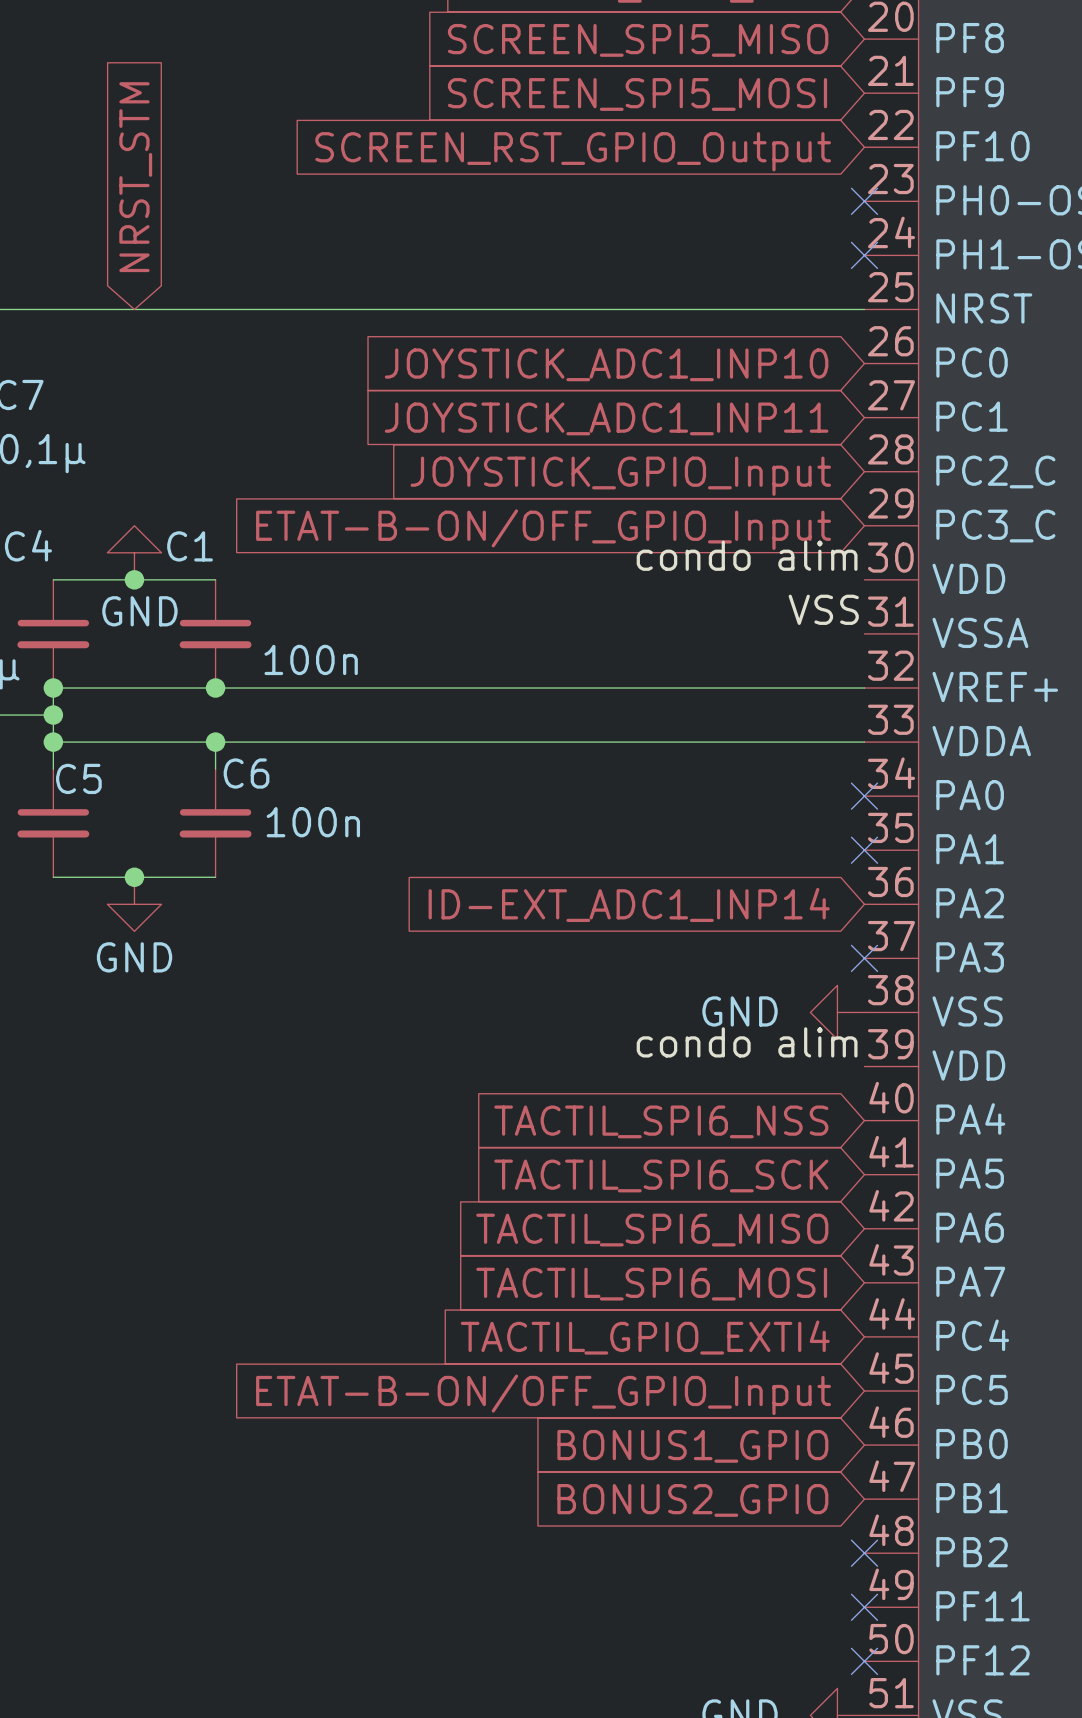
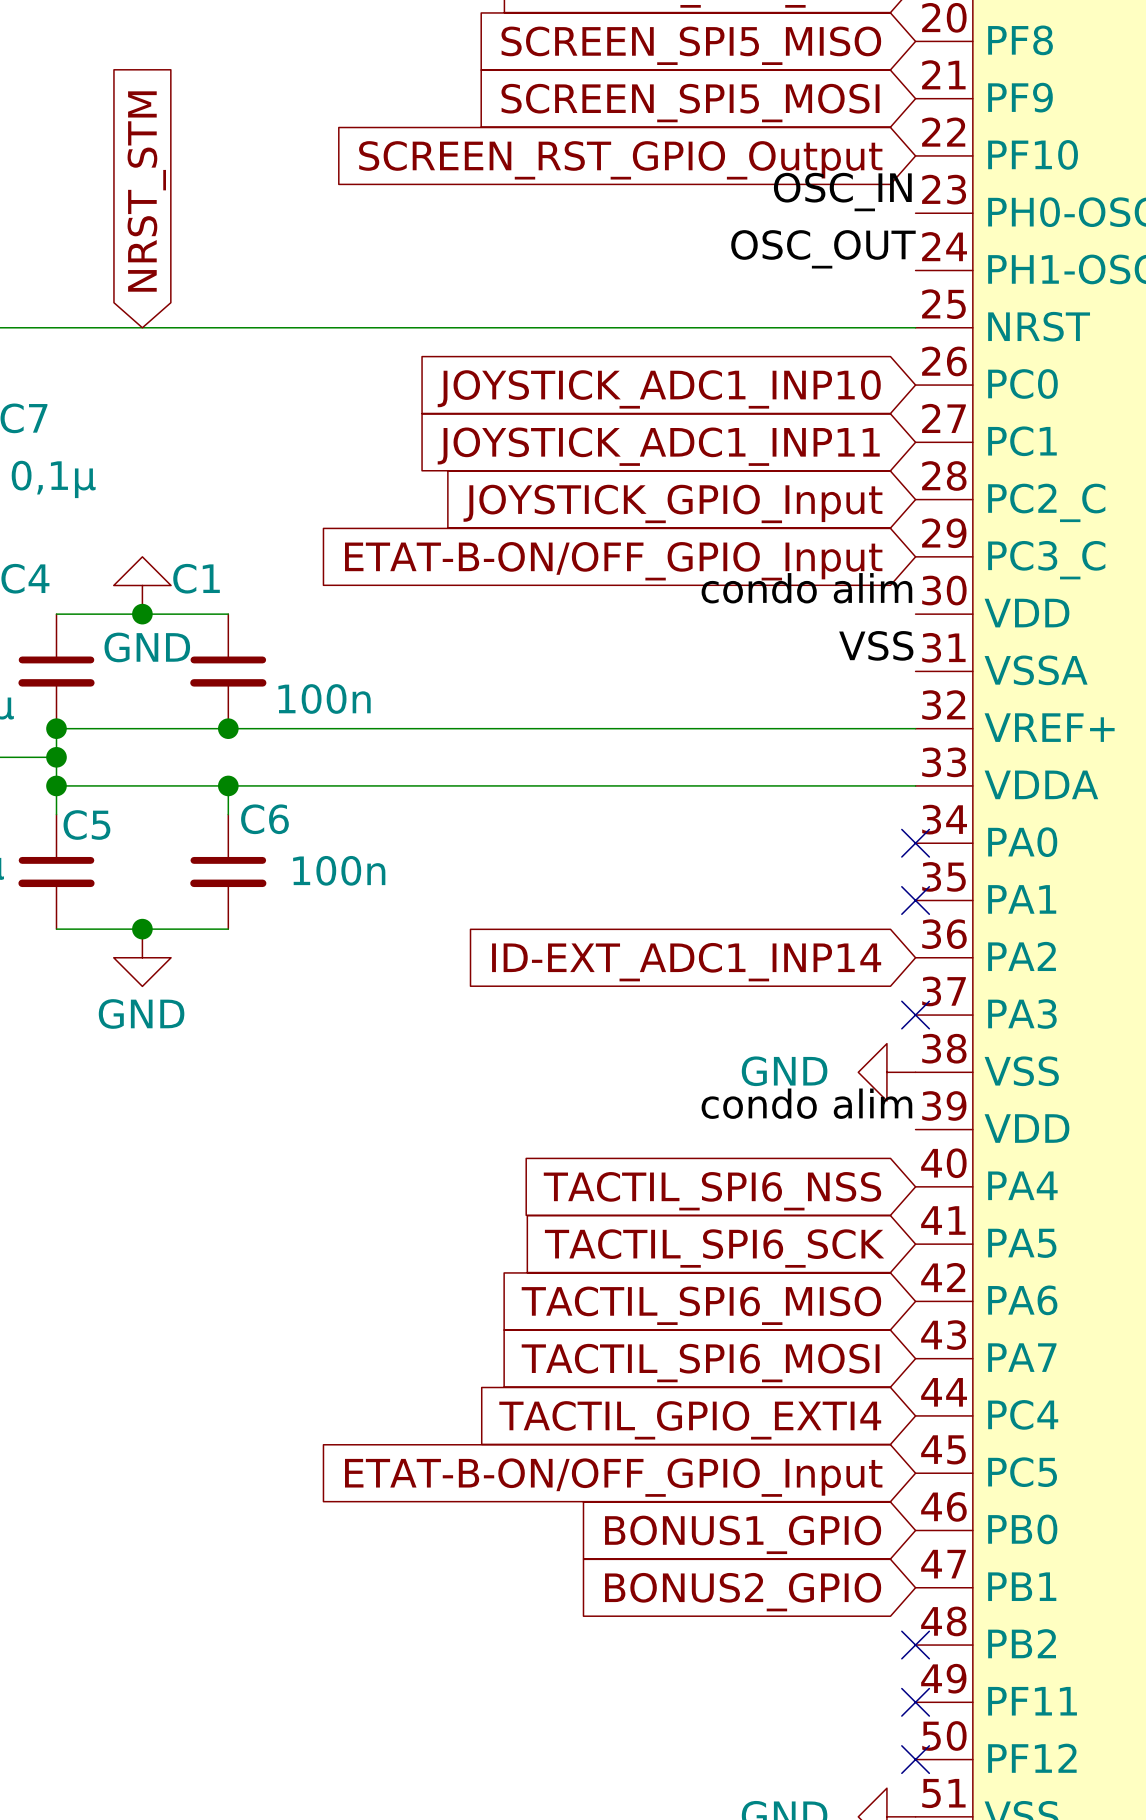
label: none -> OSC_IN (842, 192)
no-connect mark: (864, 201) -> none
label: none -> OSC_OUT (823, 249)
no-connect mark: (864, 255) -> none

